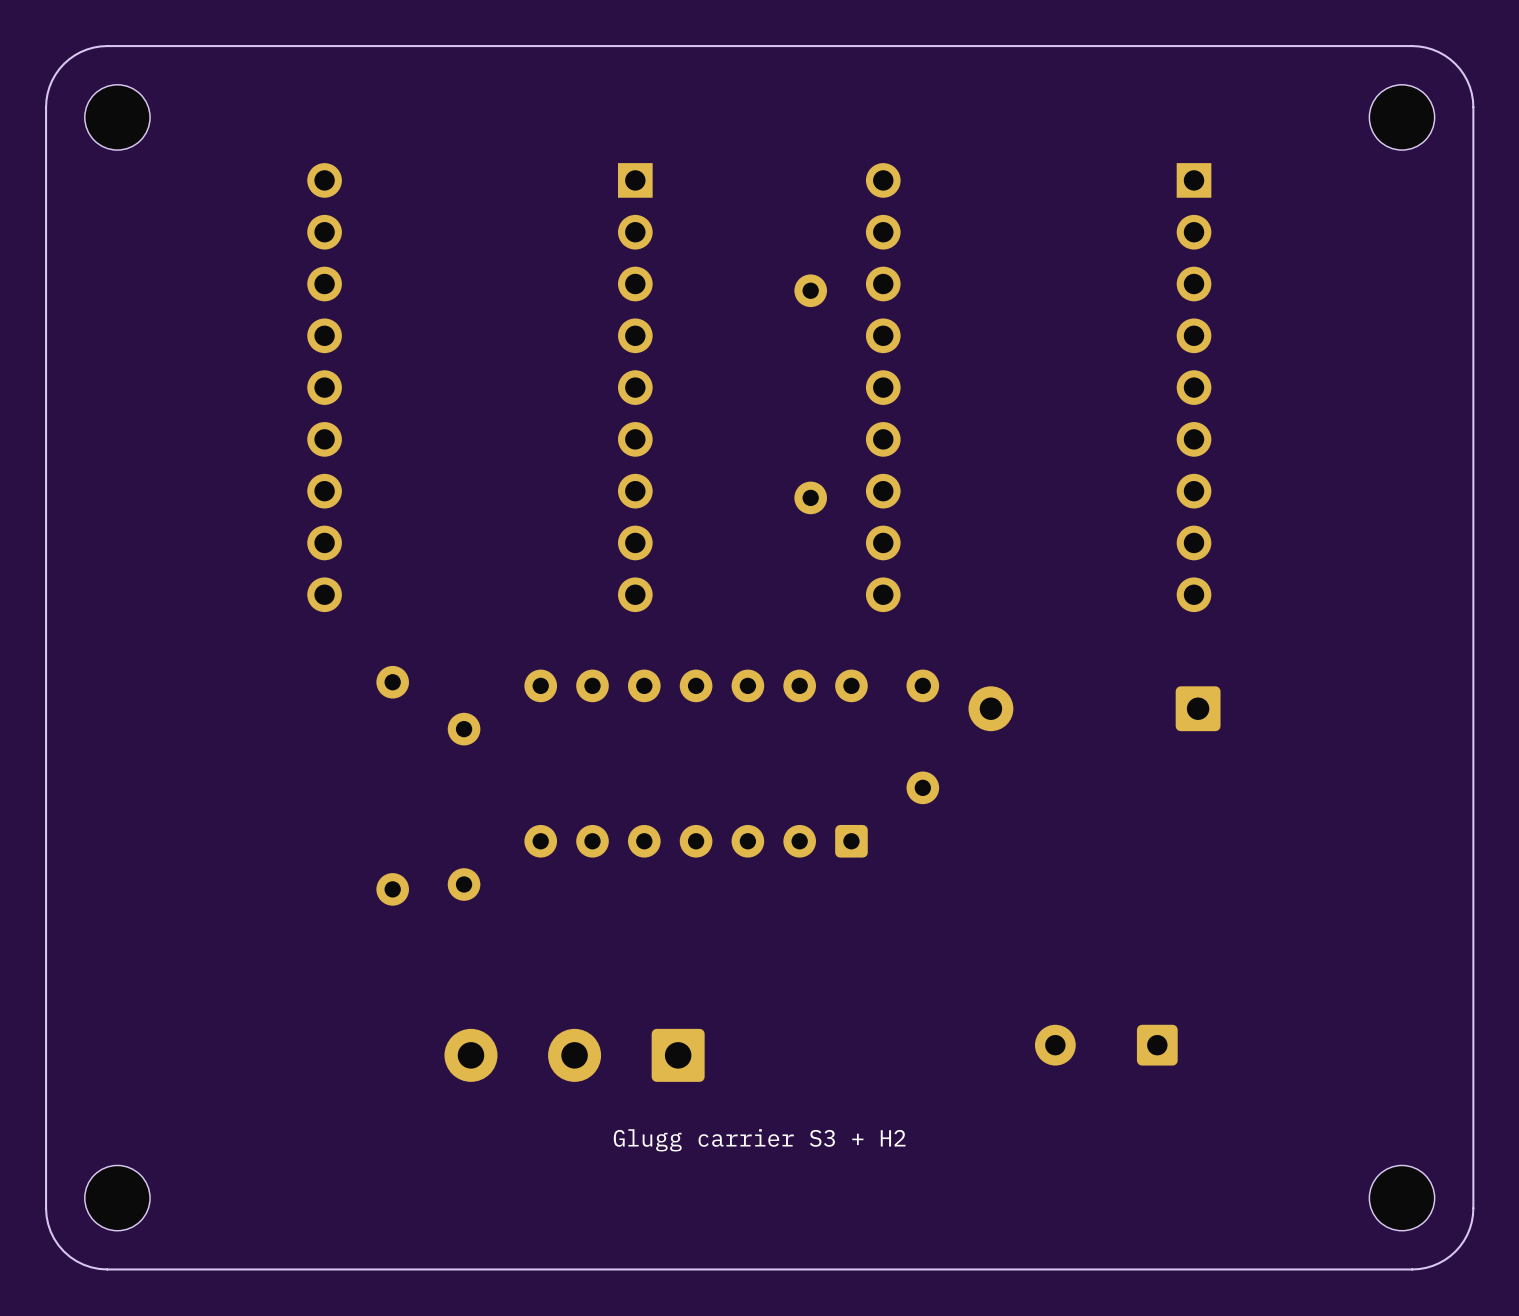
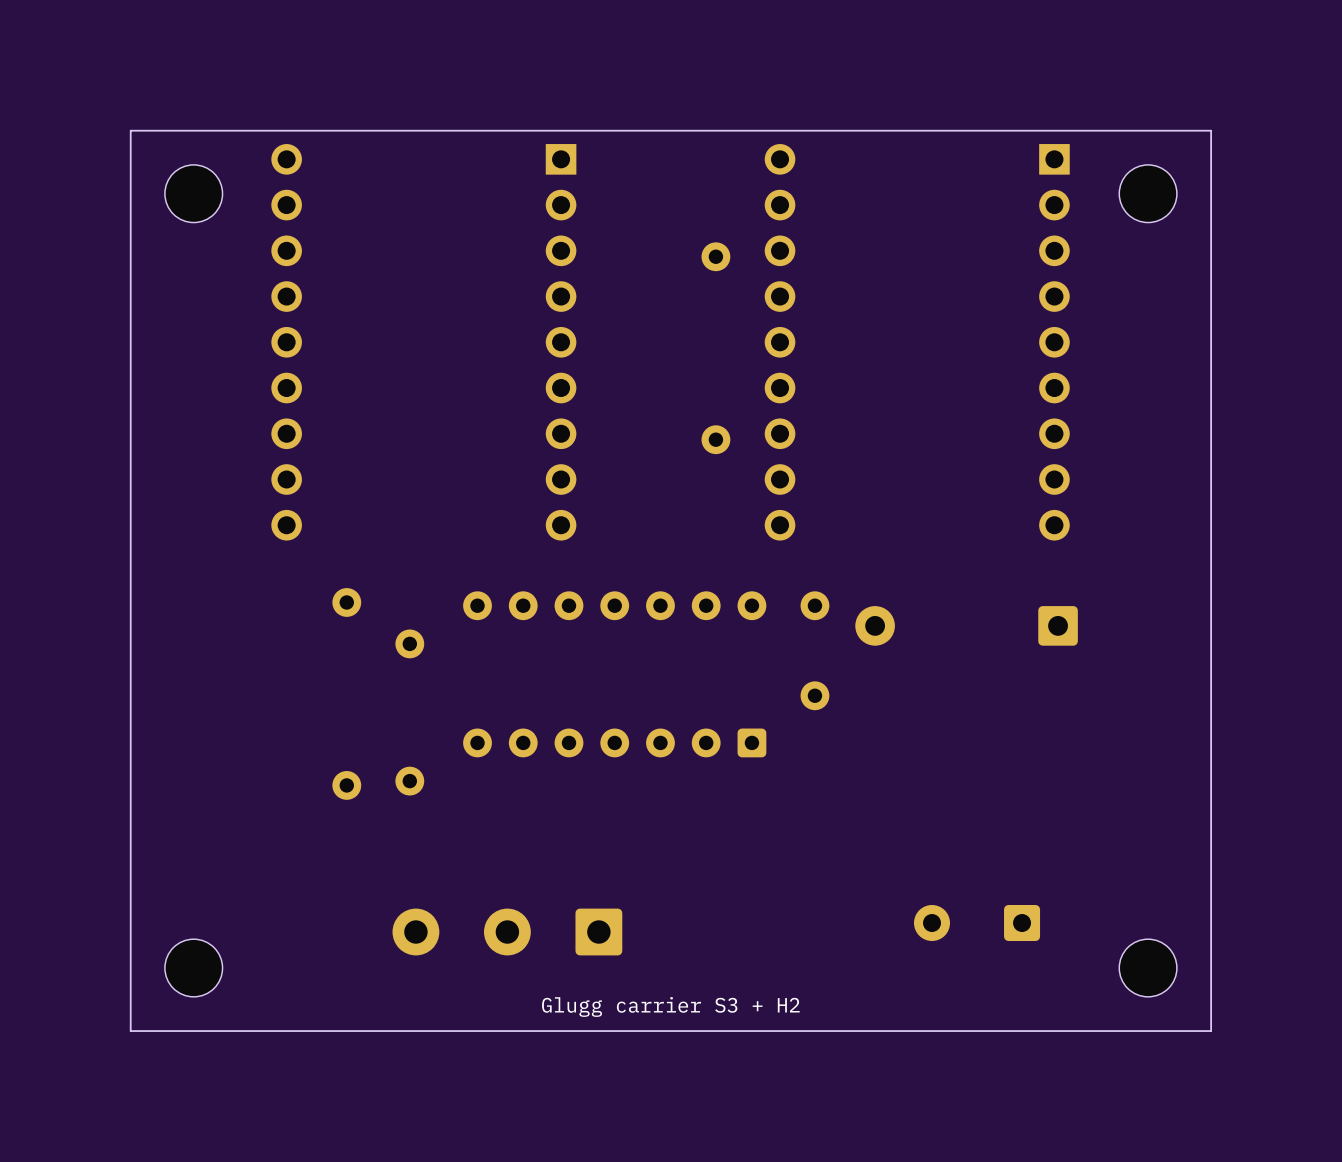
board edge: (1412, 46) (107, 46) (87, 49) (74, 55) (63, 63) (55, 74) (49, 87) (46, 107) (46, 1208) (50, 1231) (63, 1251) (83, 1264) (107, 1269) (1412, 1269) (1432, 1266) (1444, 1260) (1455, 1251) (1463, 1240) (1469, 1228) (1473, 1208) (1473, 107) (1469, 87) (1463, 74) (1455, 63) (1444, 55) (1432, 49) (1412, 46) -> (1211, 130) (1211, 1031) (130, 1031) (130, 130) (1211, 130)
part position: (117, 117) -> (193, 193)
part position: (1402, 117) -> (1148, 193)
part position: (117, 1198) -> (193, 968)
part position: (1402, 1198) -> (1148, 968)

